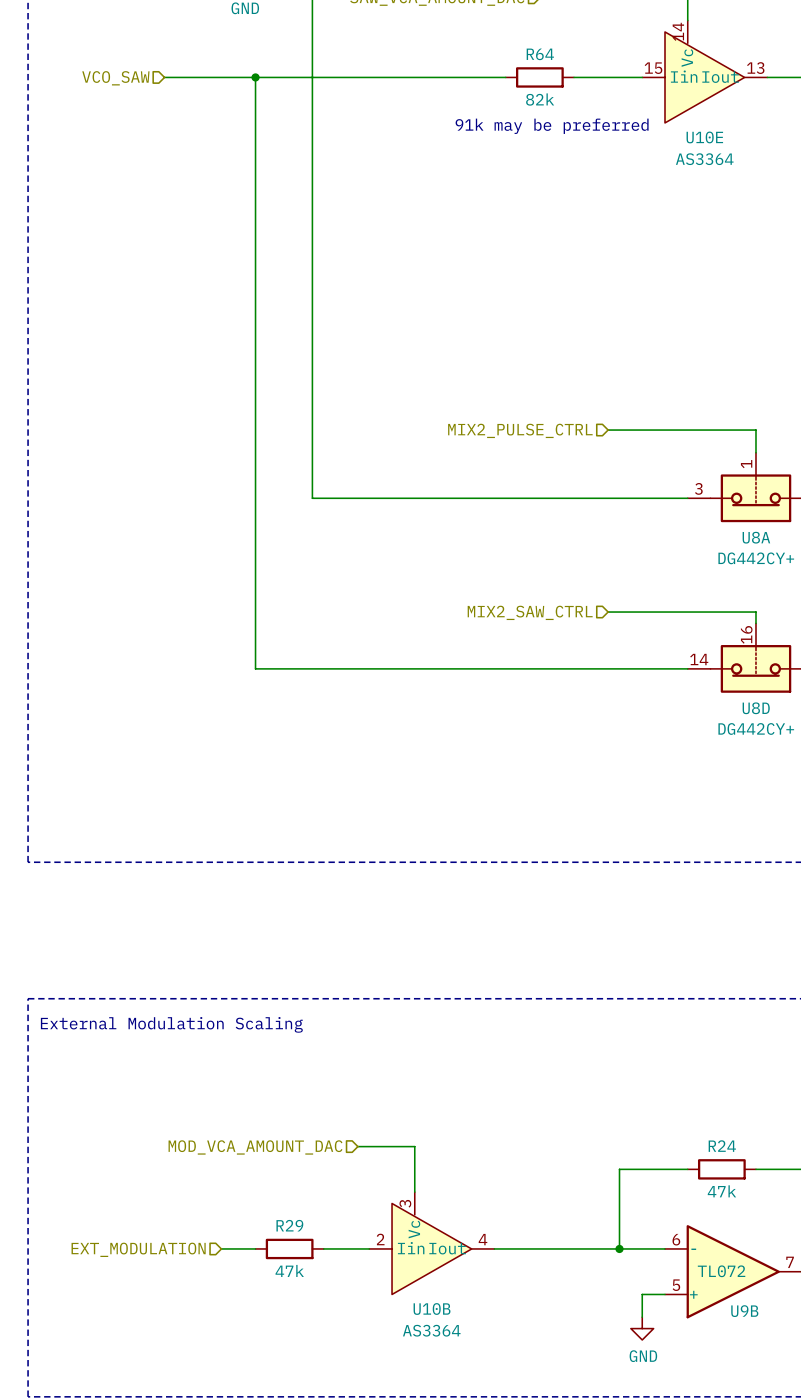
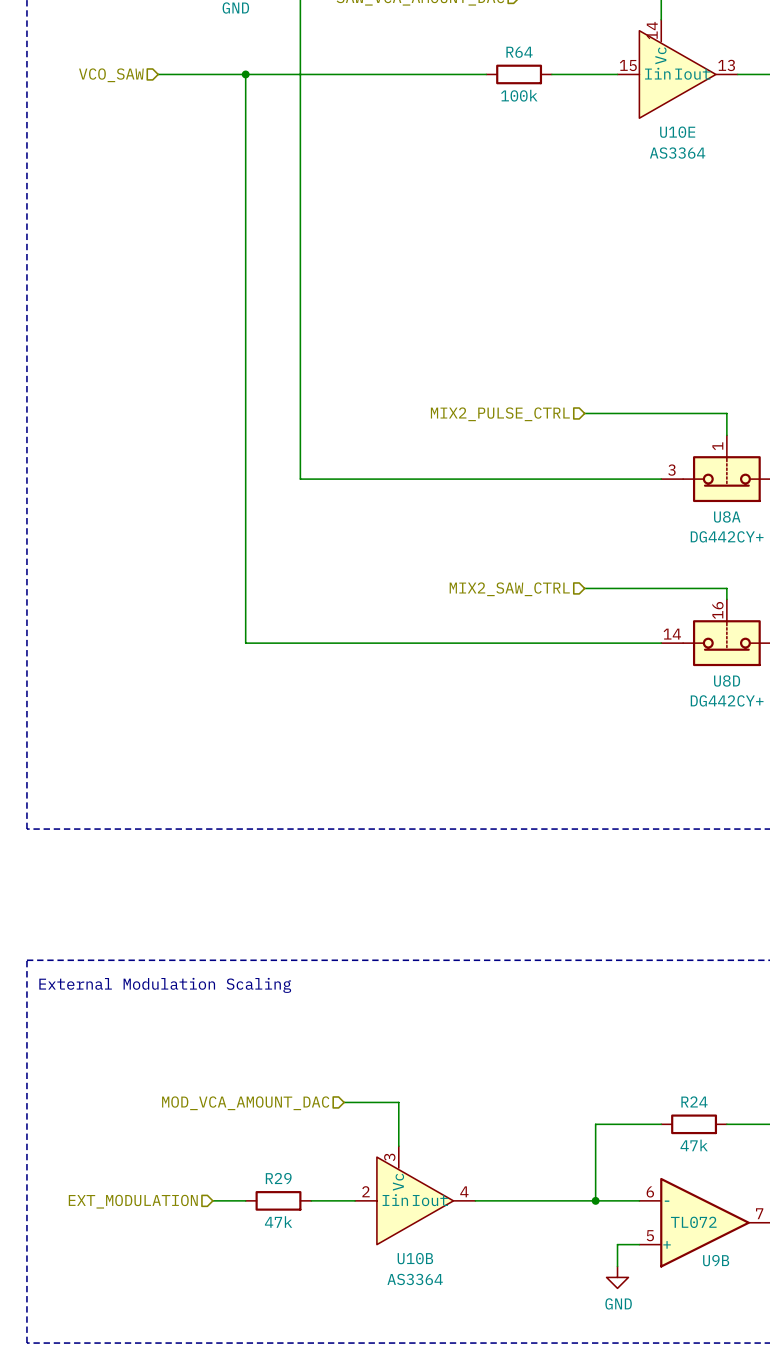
R64 value: 82k (540, 99) -> 100k (519, 95)
text: 91k may be preferred (552, 126) -> none

